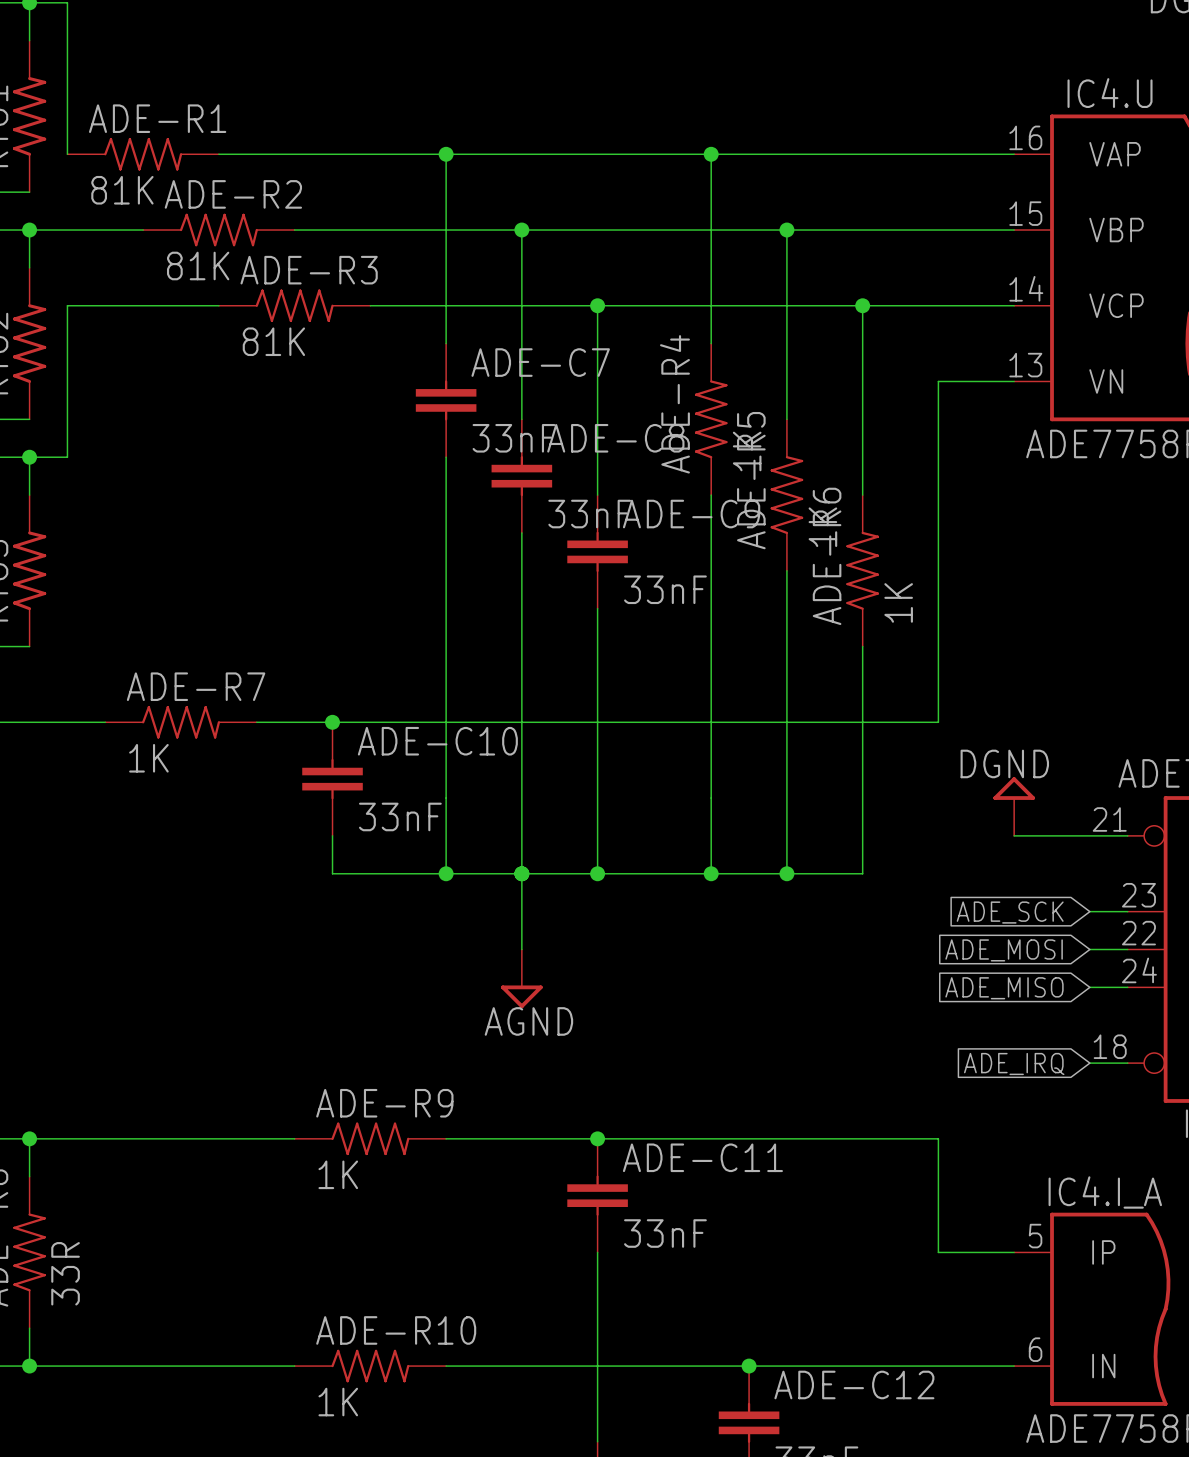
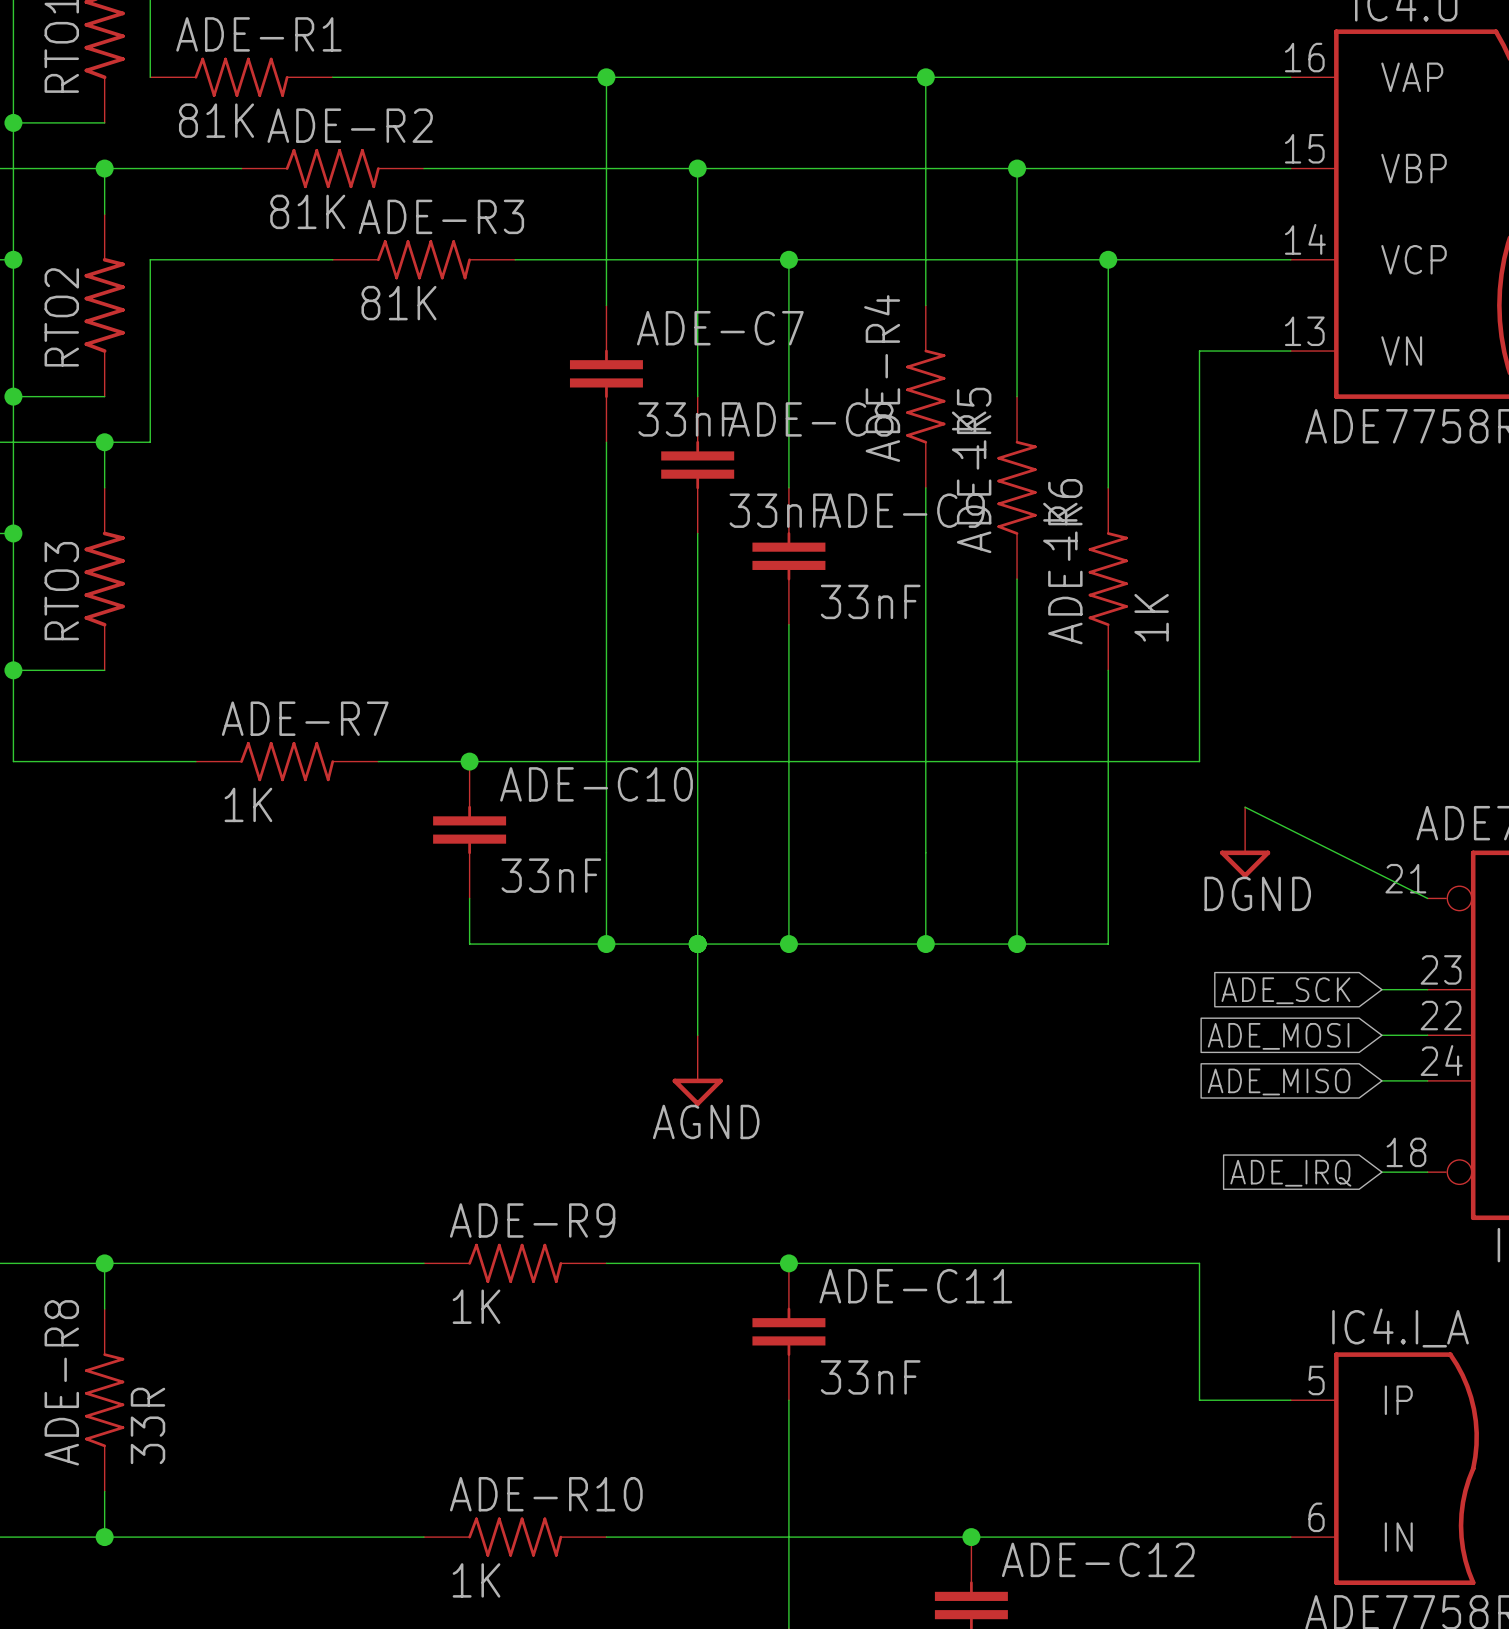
power symbol rotation: 0° (1014, 788) -> 180° (1245, 864)
power symbol position: DGND (1014, 806) -> DGND (1245, 842)
wire: (1014, 835) (1127, 835) -> (1245, 807) (1427, 898)

